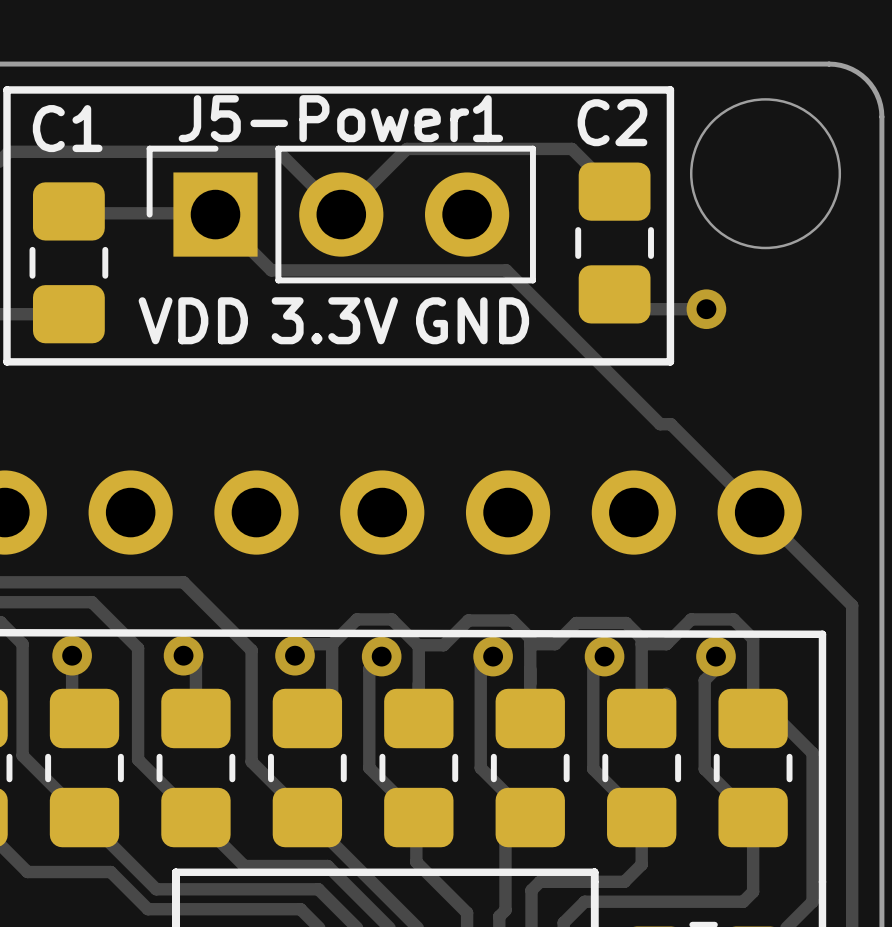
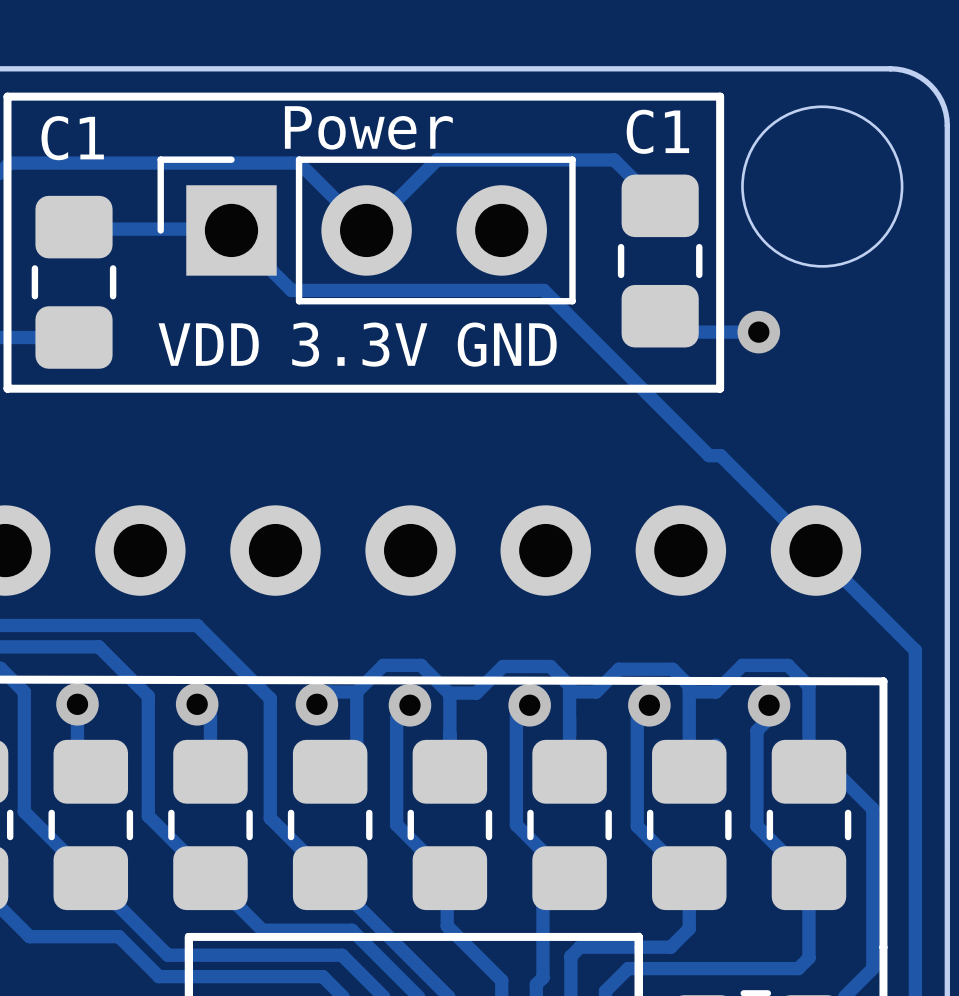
J5-Power1 name: J5-Power1 (340, 118) -> Power (368, 127)
C2 name: C2 (612, 122) -> C1 (657, 131)

